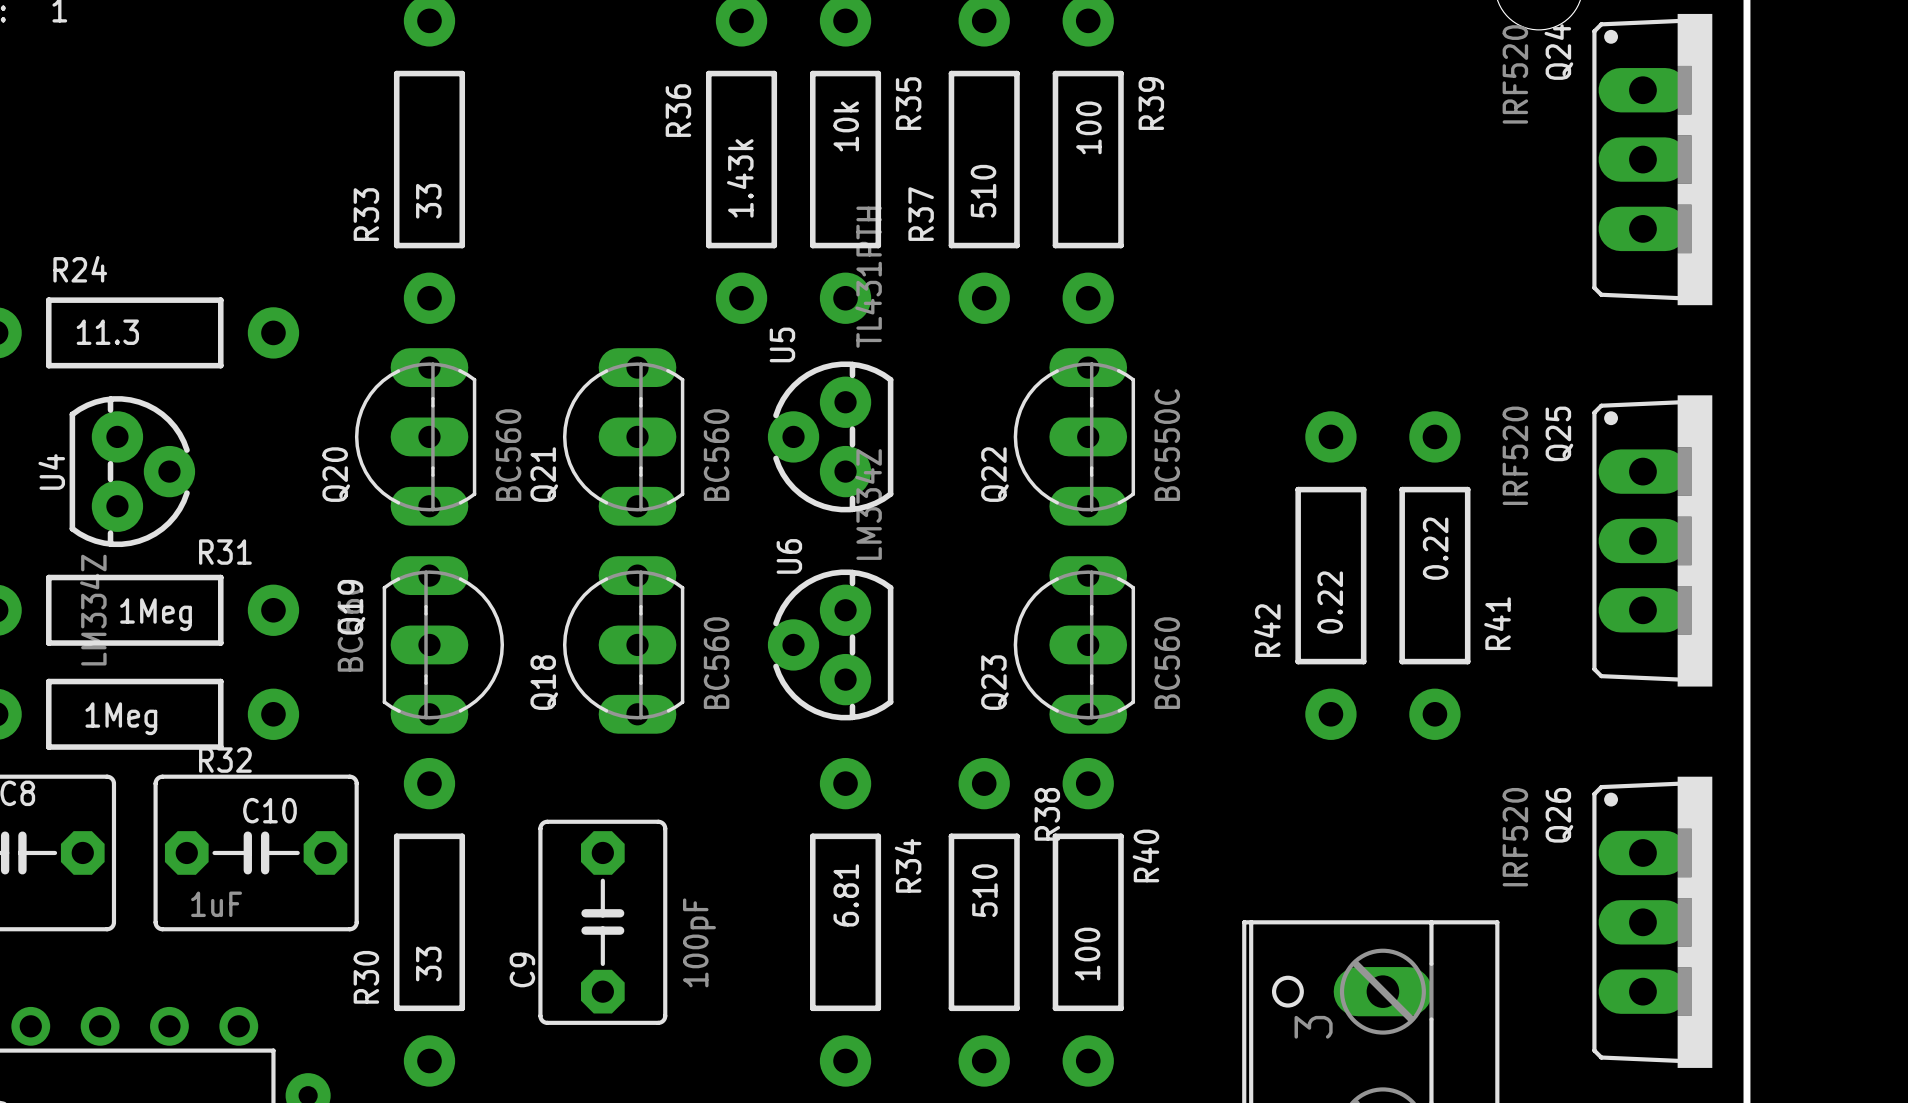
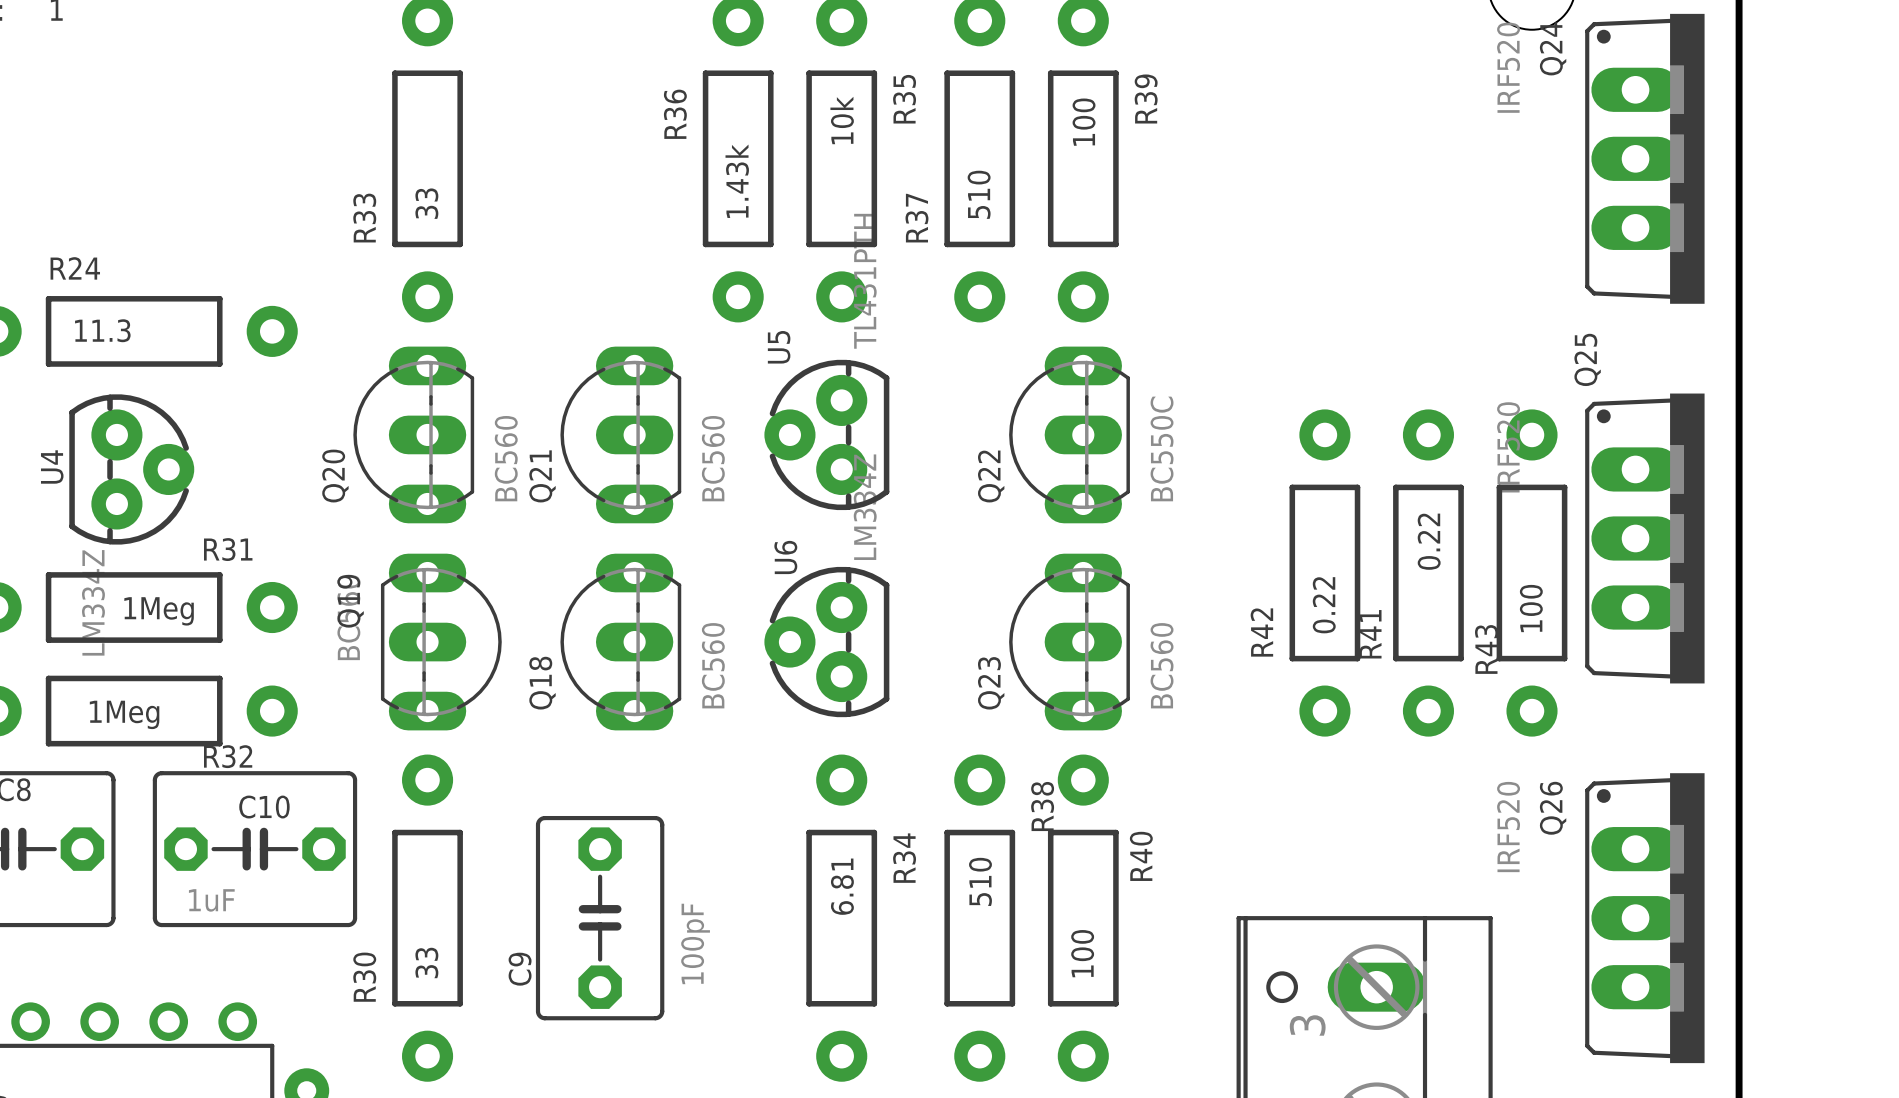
Q25 name position: Q25 (1559, 433) -> Q25 (1587, 359)
R43: none -> 100 (1532, 573)
R41 name position: R41 (1497, 623) -> R41 (1370, 634)

